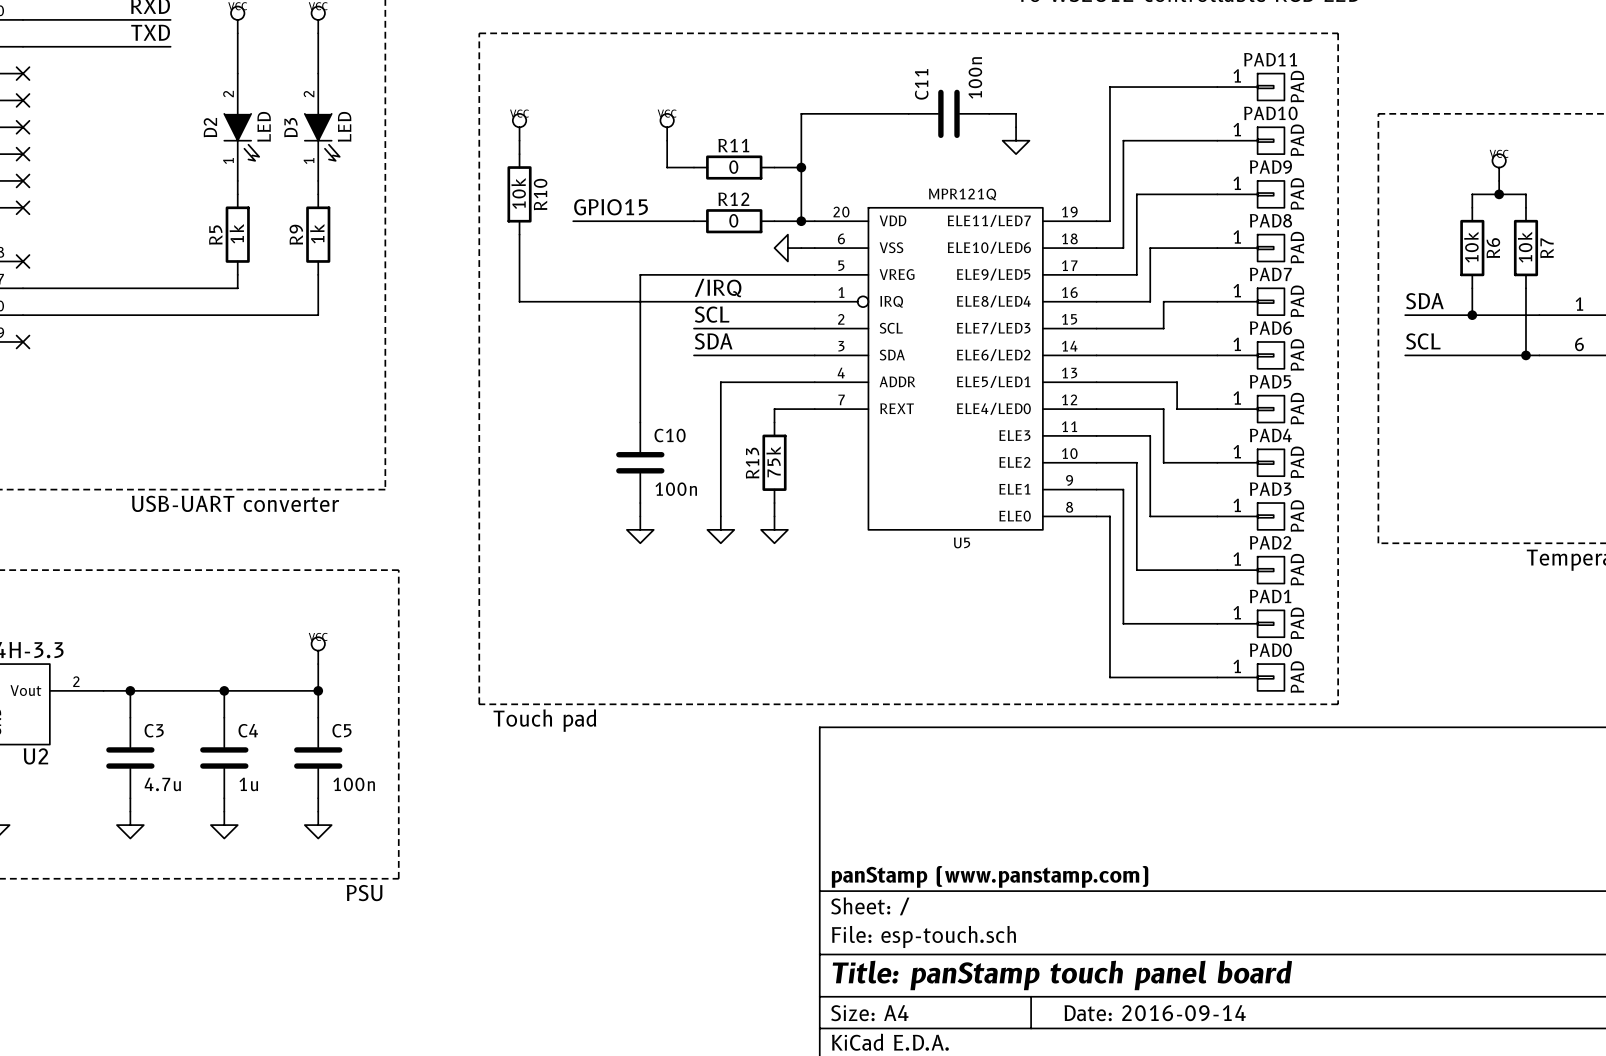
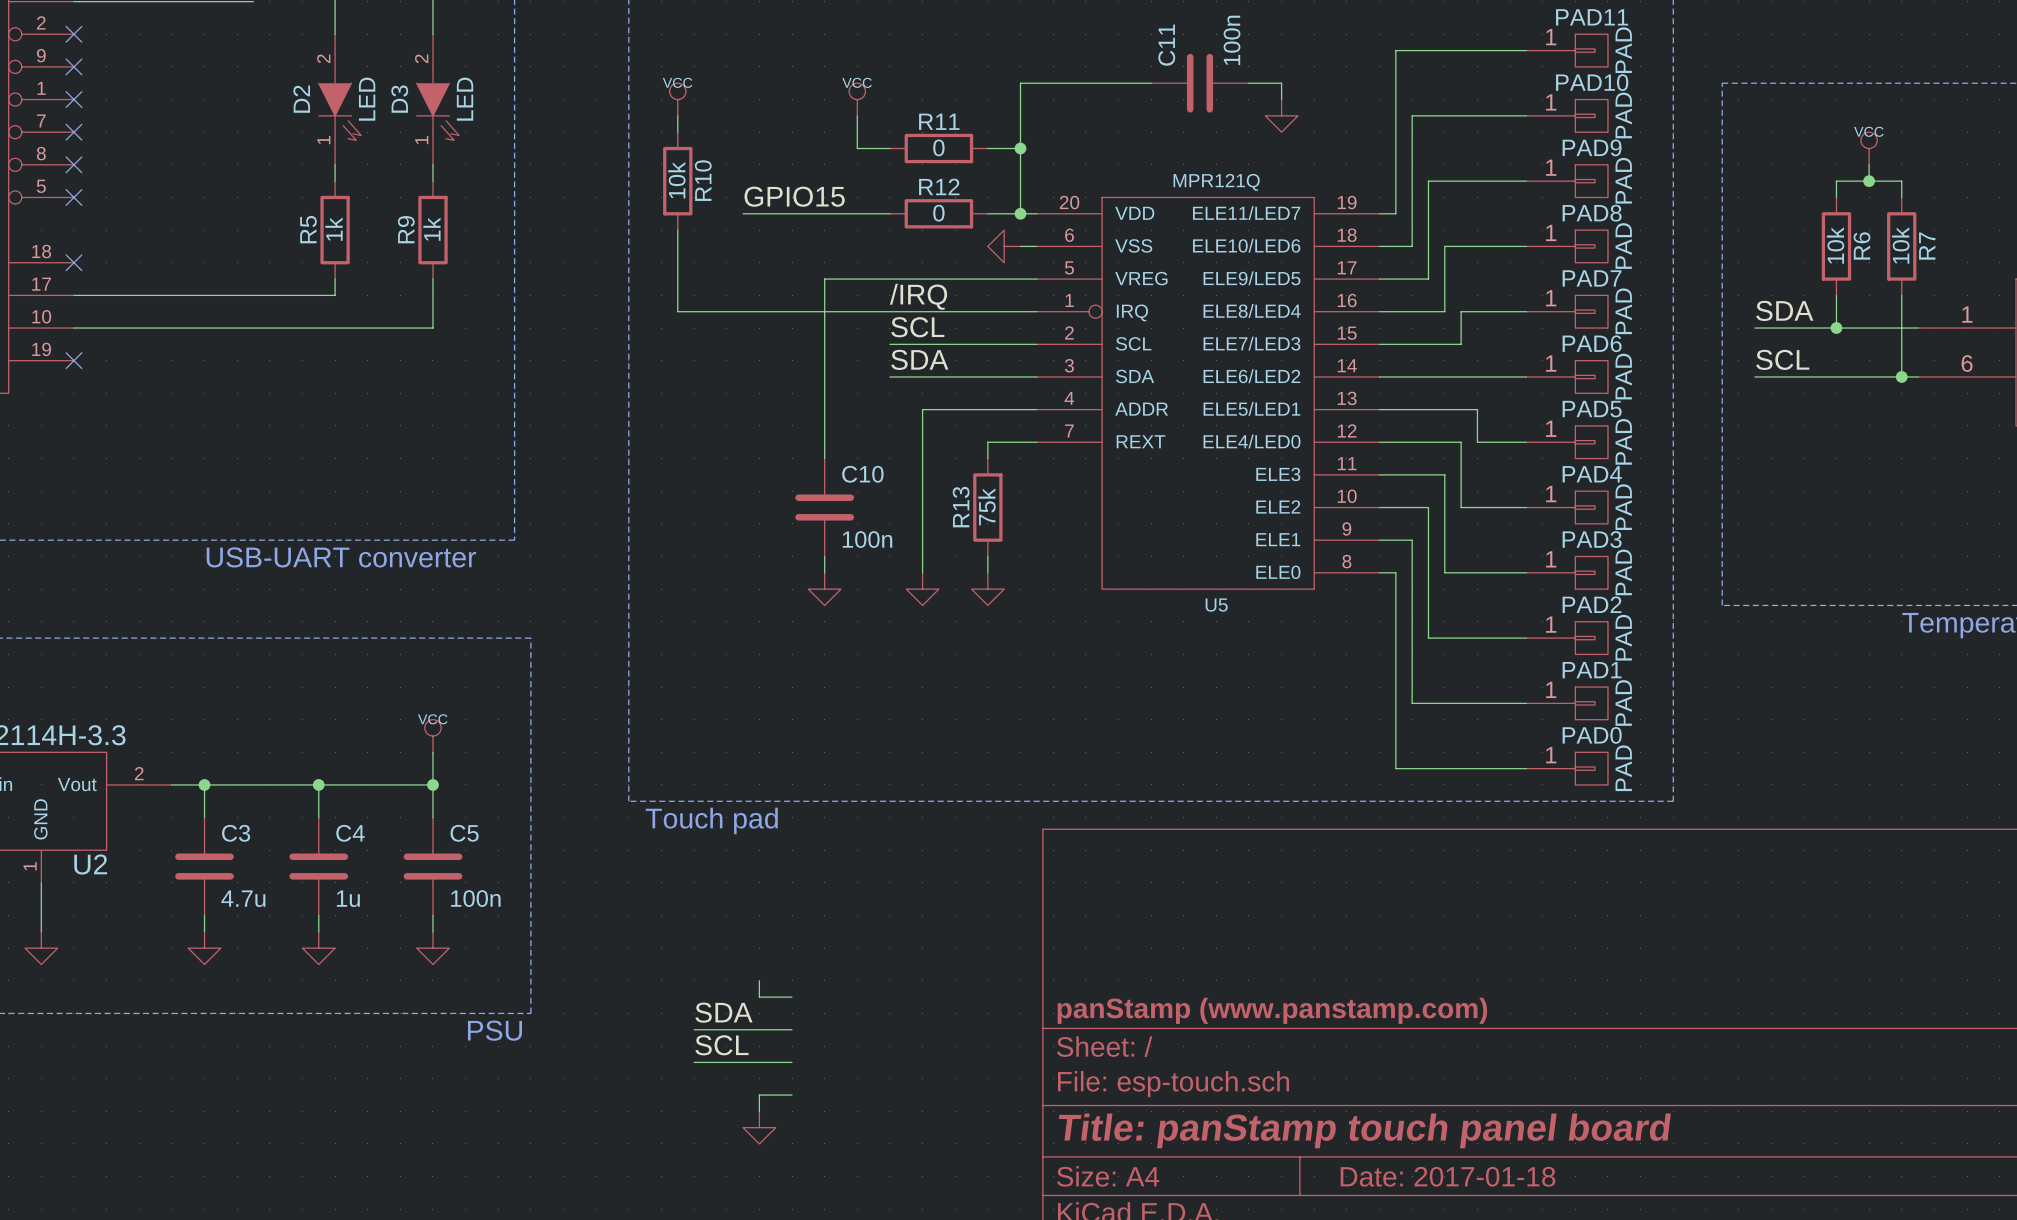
wire: none -> (759, 980) (759, 997) (792, 997)
label: none -> SDA (723, 1012)
wire: none -> (694, 1029) (792, 1029)
label: none -> SCL (721, 1045)
wire: none -> (694, 1062) (792, 1062)
wire: none -> (792, 1095) (759, 1095) (759, 1111)
power symbol: none -> (759, 1127)
title block: Date: 2016-09-14 (1155, 1013) -> Date: 2017-01-18 (1448, 1176)

